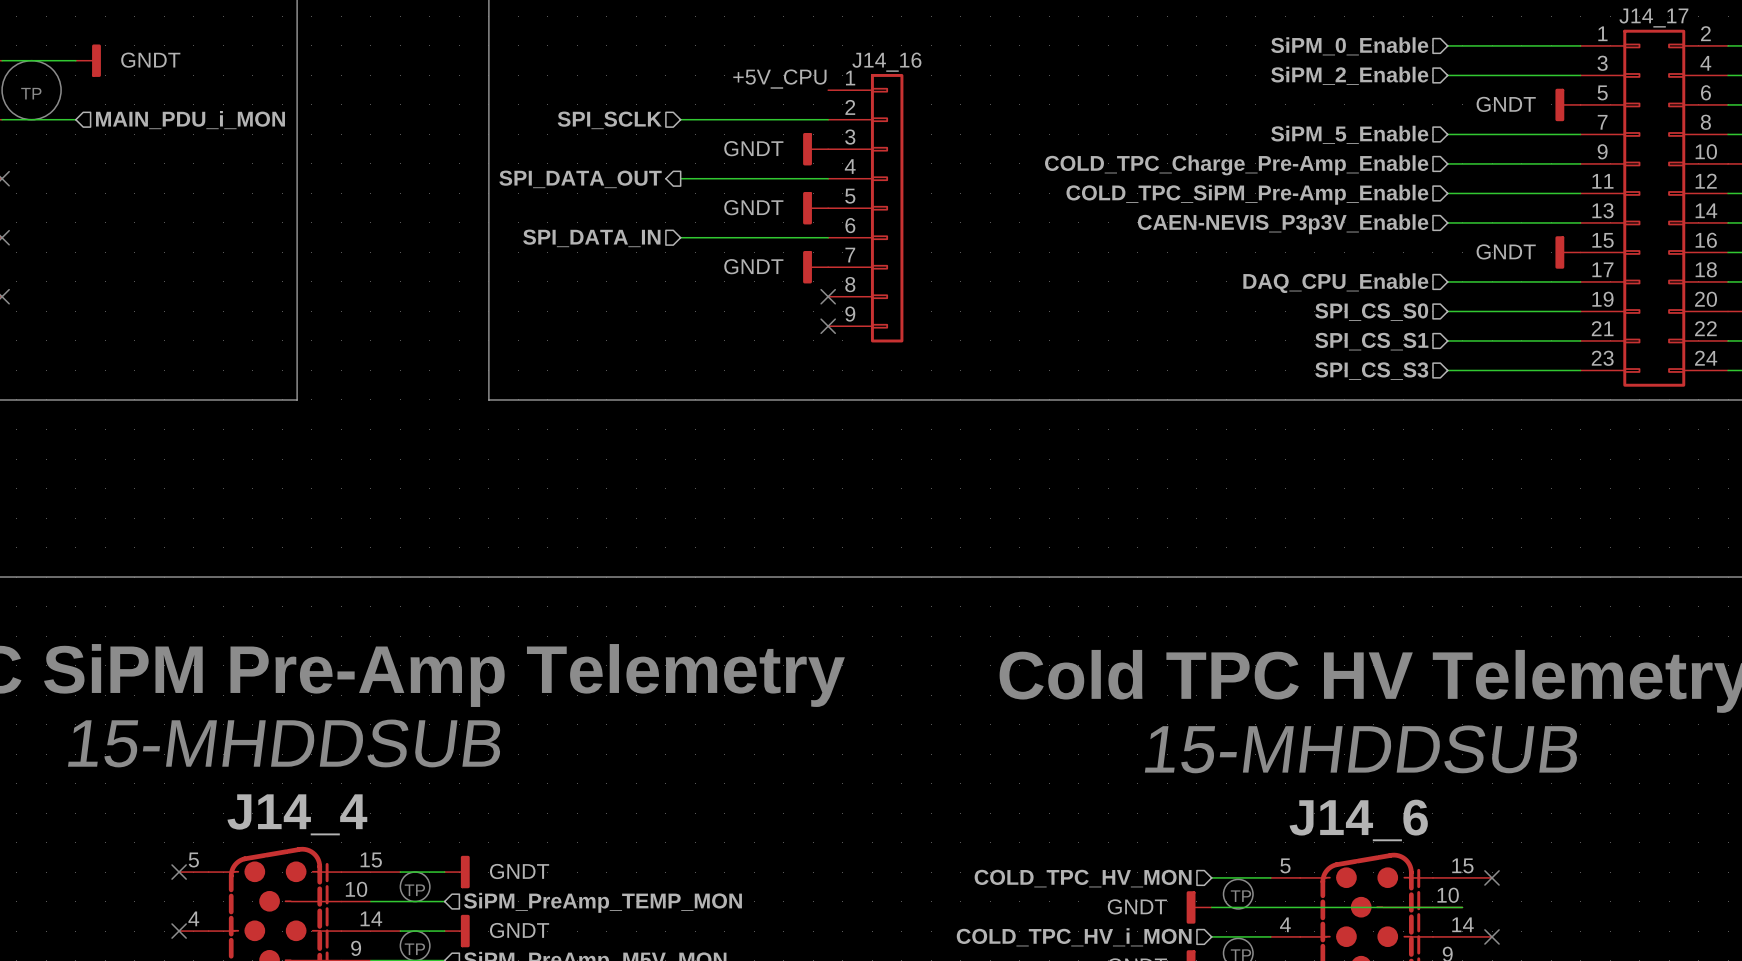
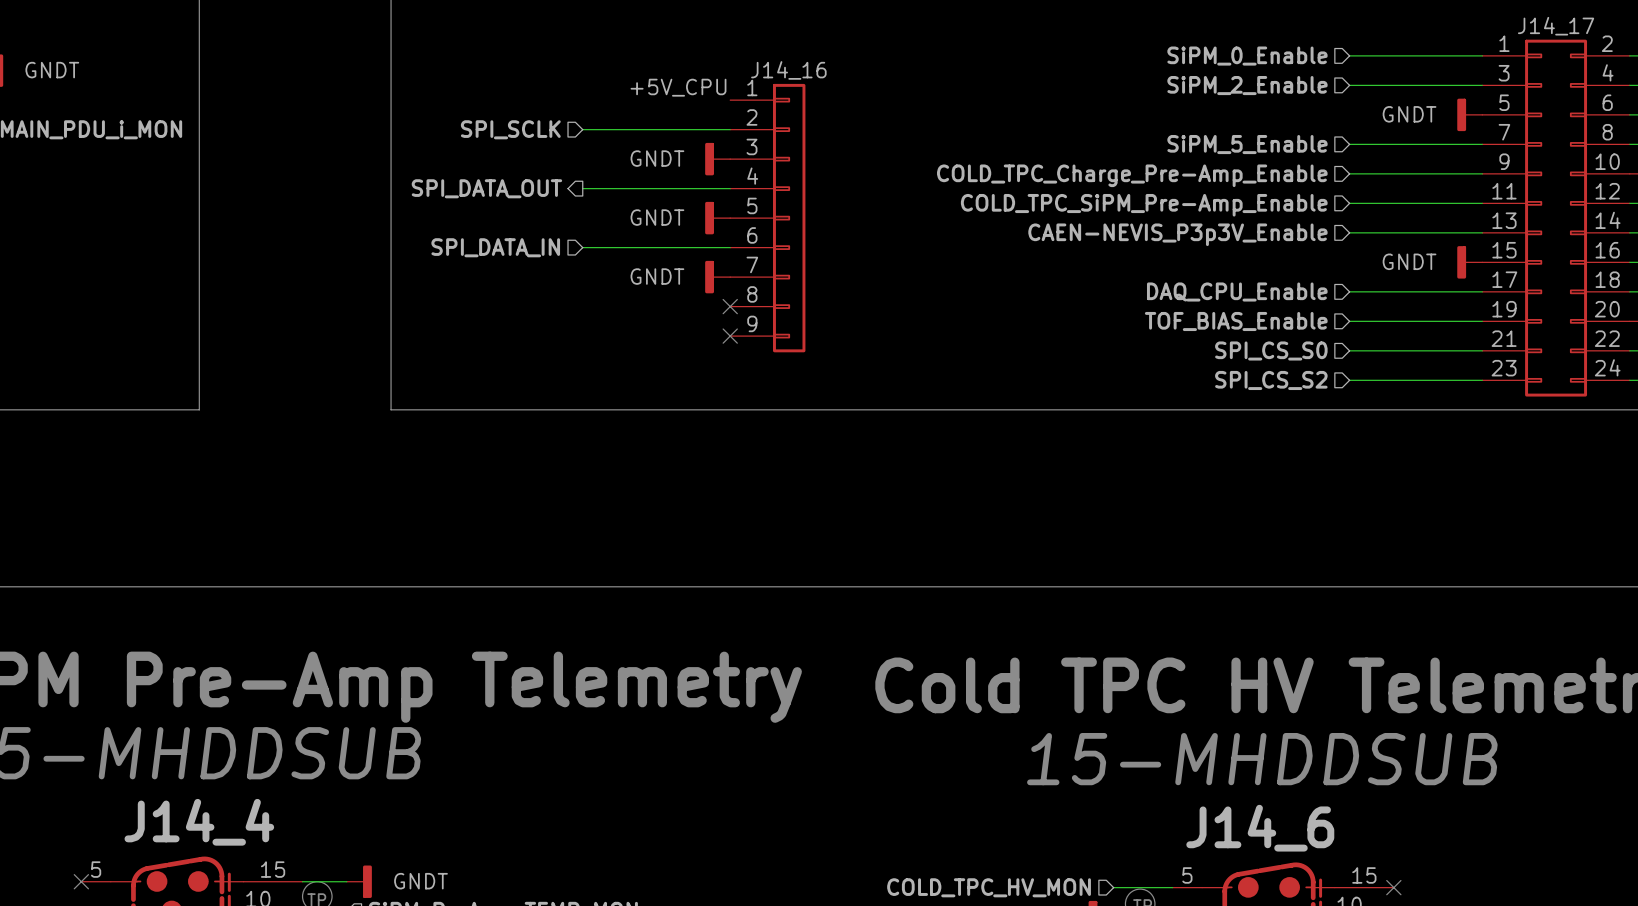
hierarchical label: SPI_CS_S0 (1371, 312) -> TOF_BIAS_Enable (1236, 321)
hierarchical label: SPI_CS_S1 (1371, 341) -> SPI_CS_S0 (1271, 350)
hierarchical label: SPI_CS_S3 (1371, 371) -> SPI_CS_S2 (1271, 380)

